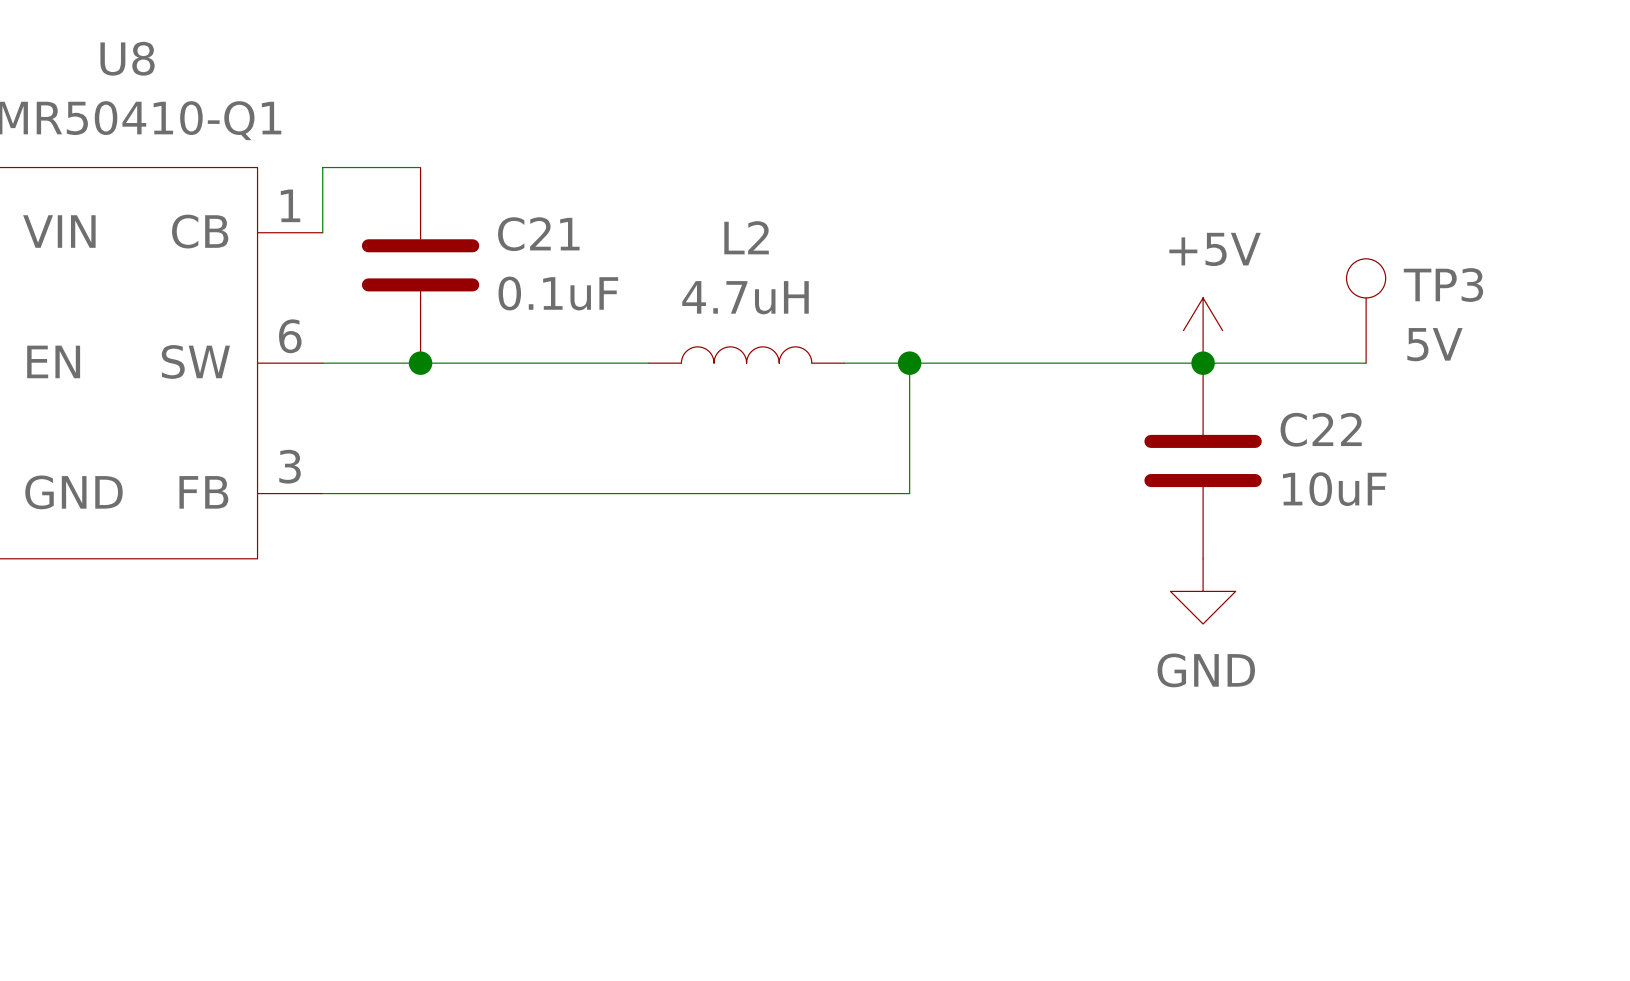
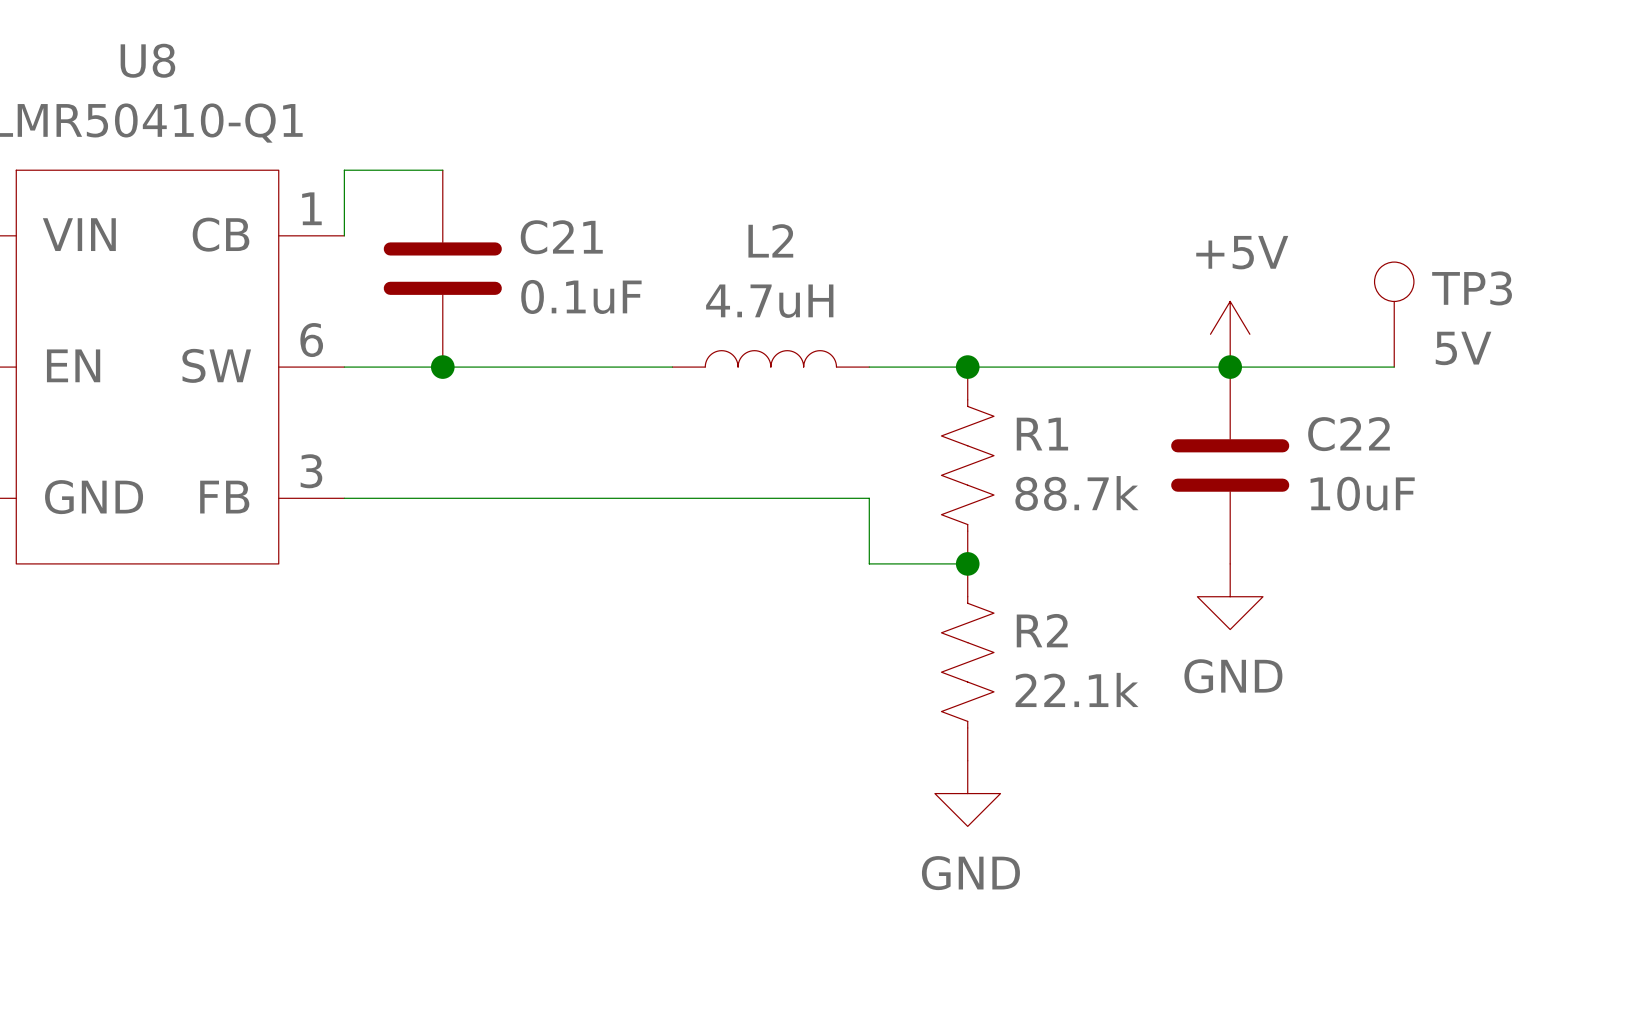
wire: (909, 363) (909, 493) (844, 493) -> (967, 563) (869, 563) (869, 498)
junction position: (909, 363) -> (967, 367)
R1: none -> 88.7k (967, 465)
junction: none -> (967, 563)
R2: none -> 22.1k (967, 662)
power symbol: none -> GND (967, 793)

